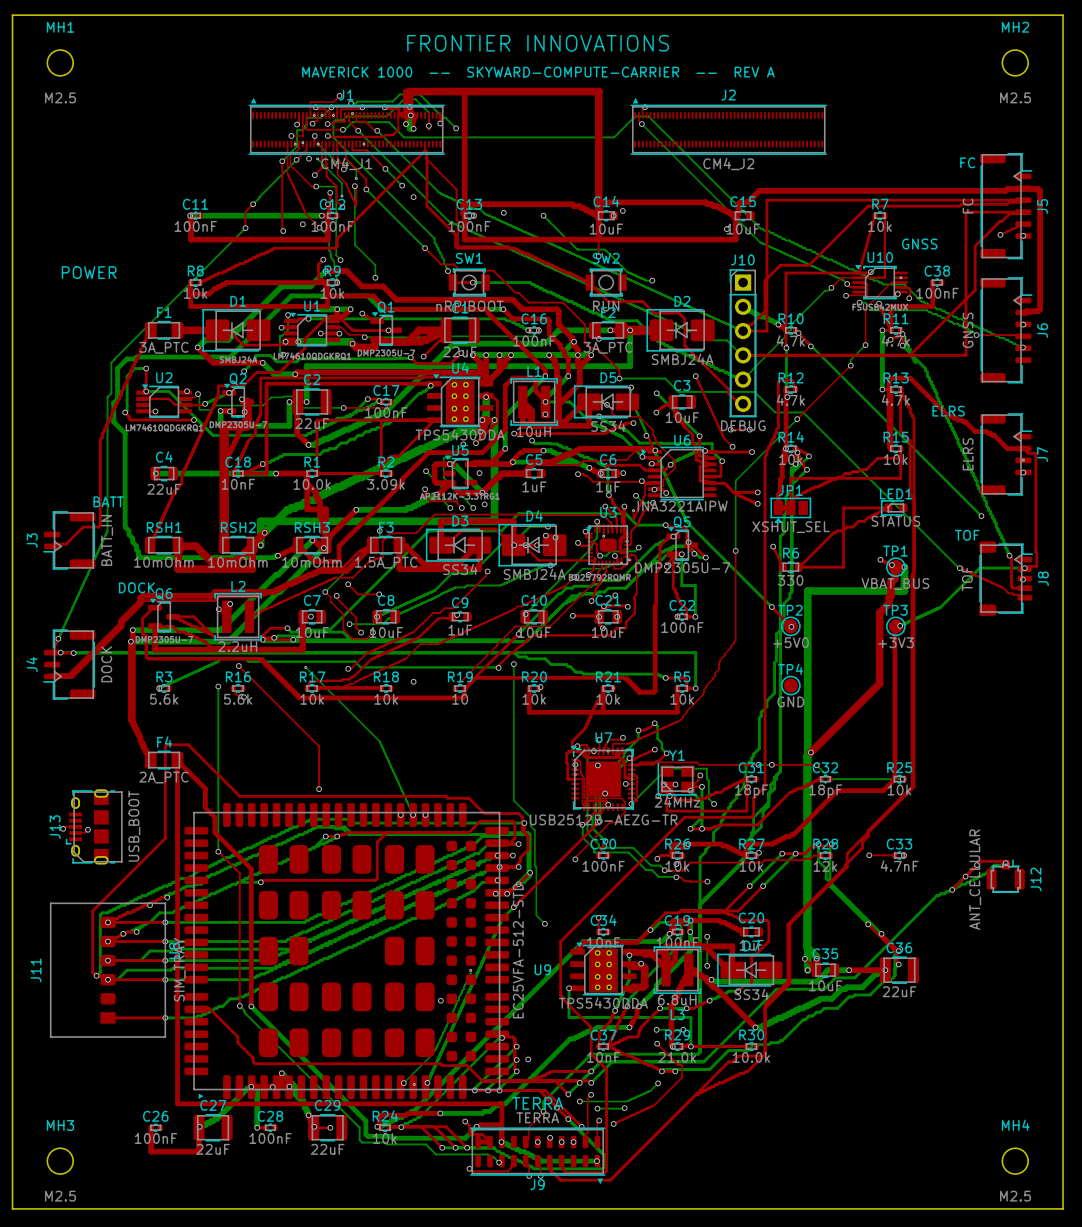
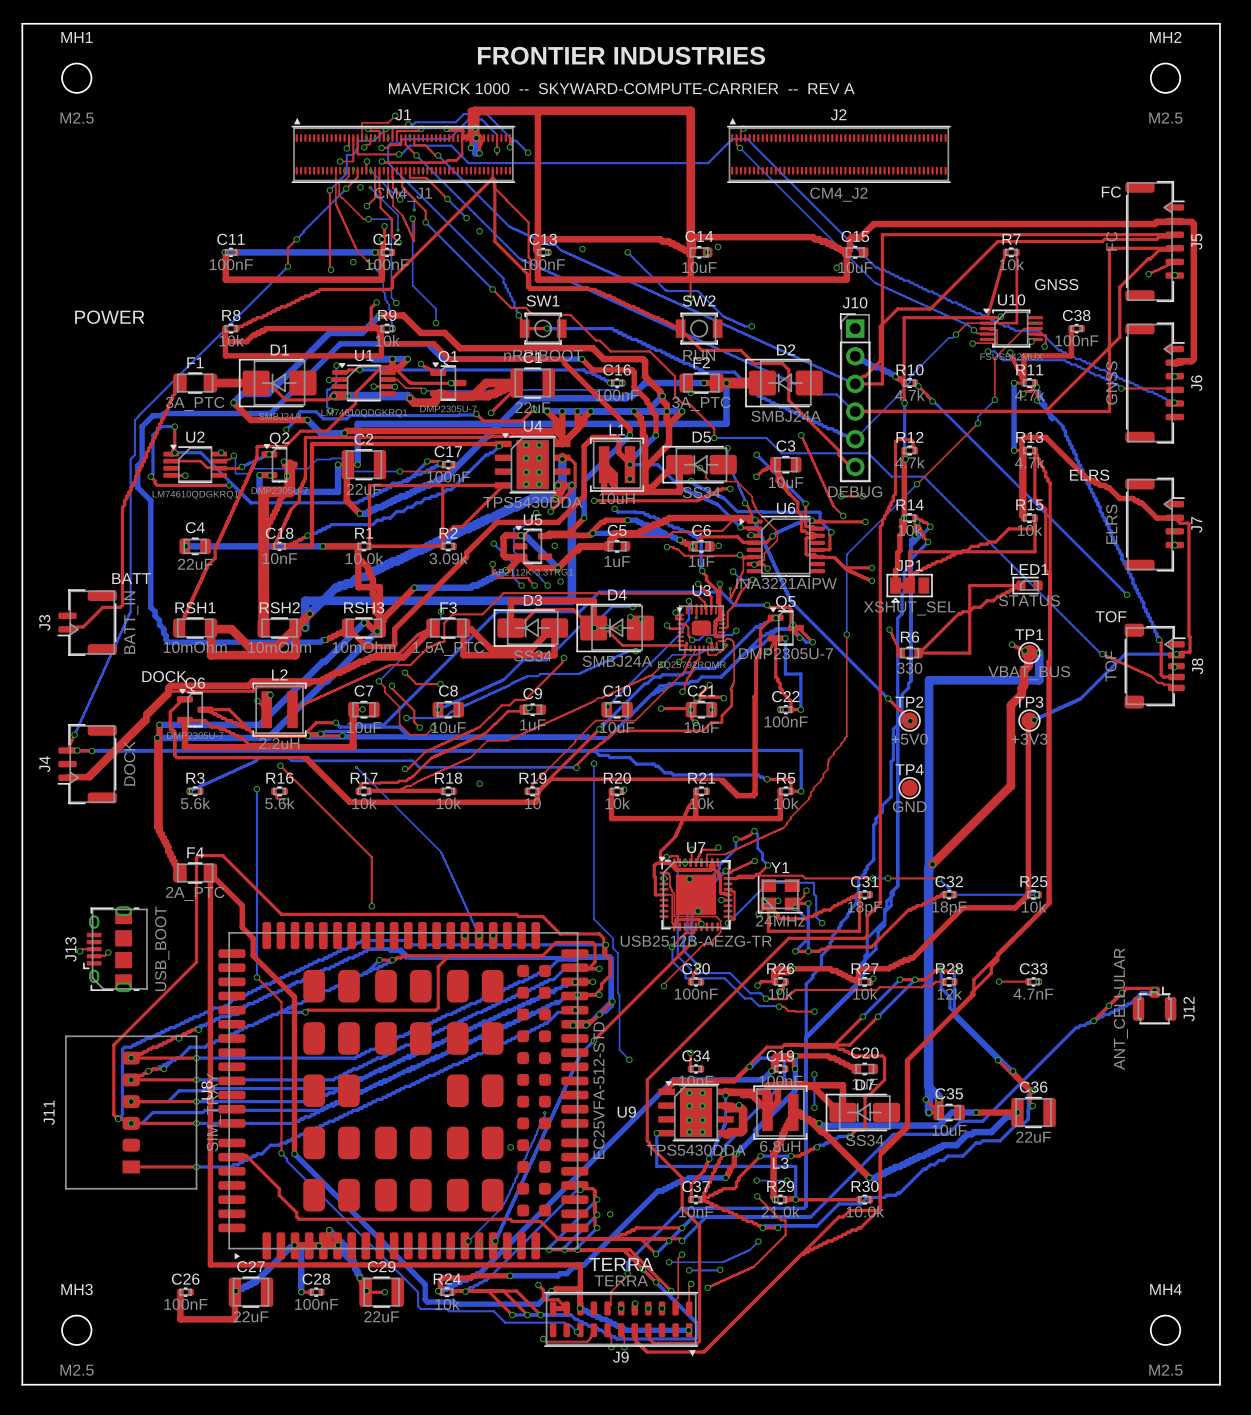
text: FRONTIER INNOVATIONS (538, 43) -> FRONTIER INDUSTRIES (621, 55)

